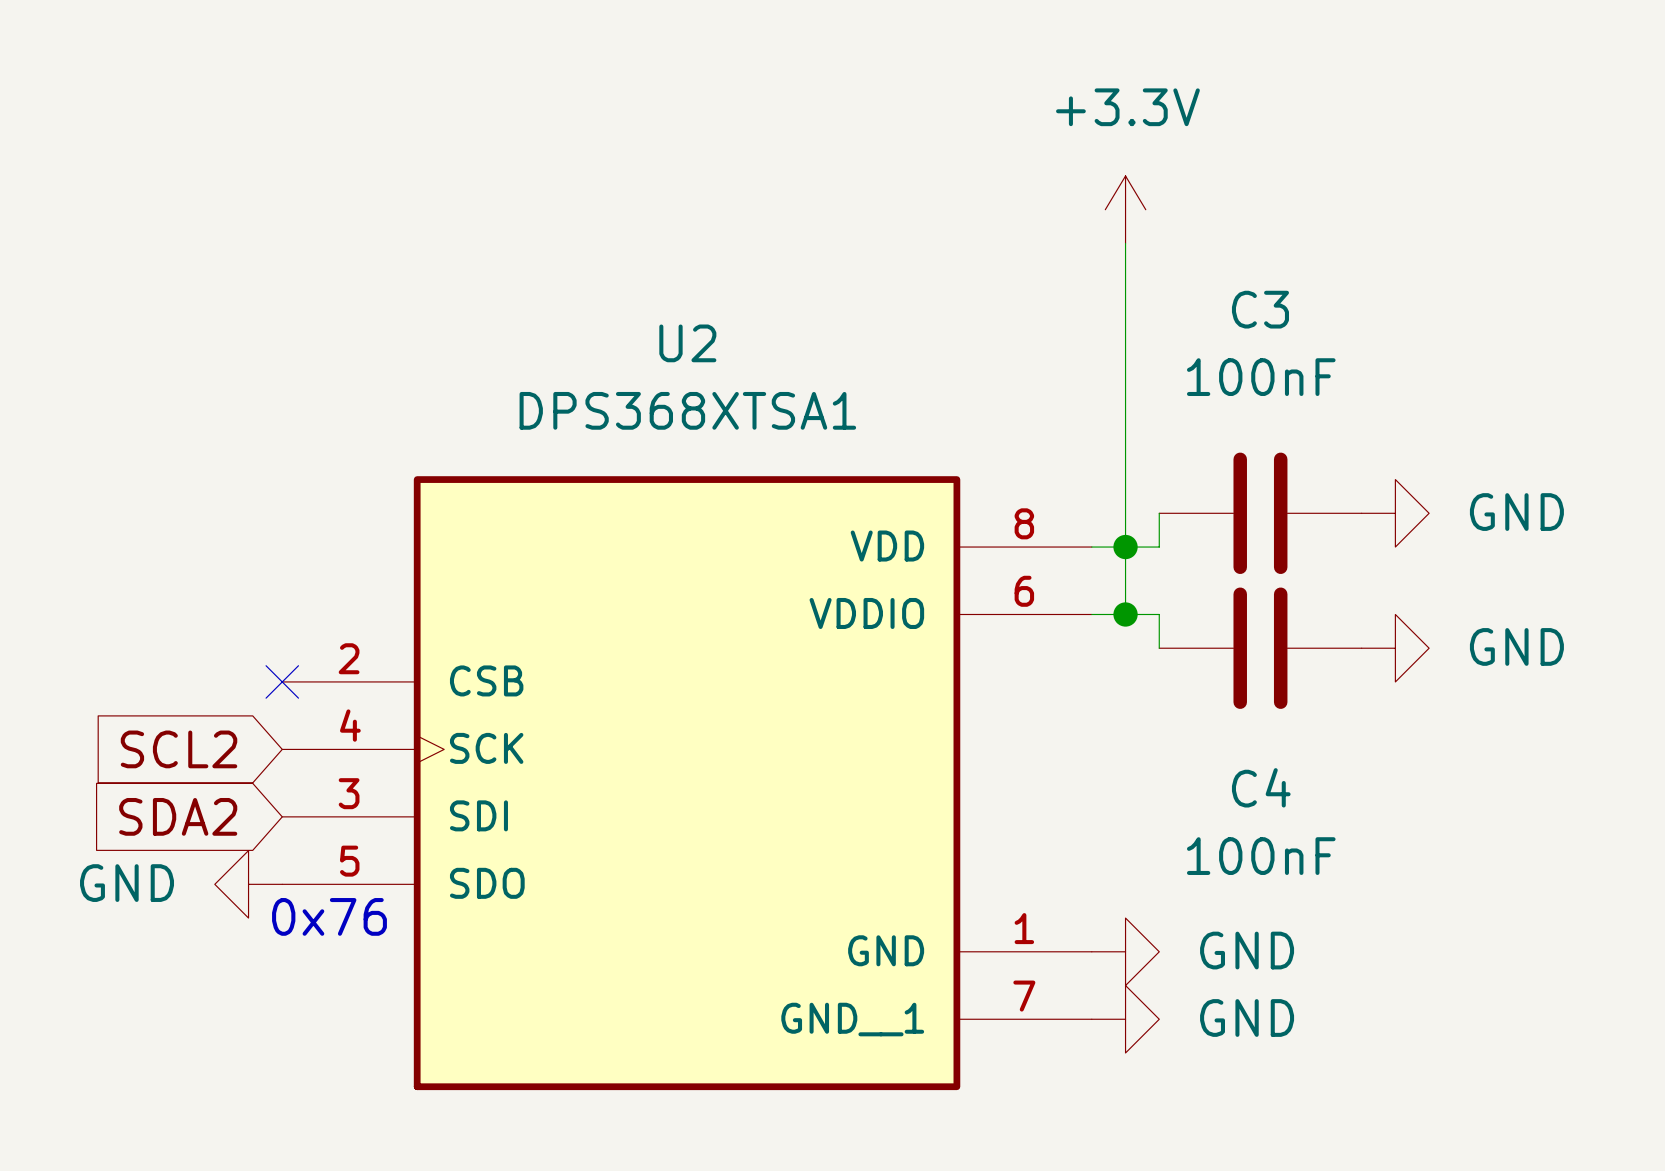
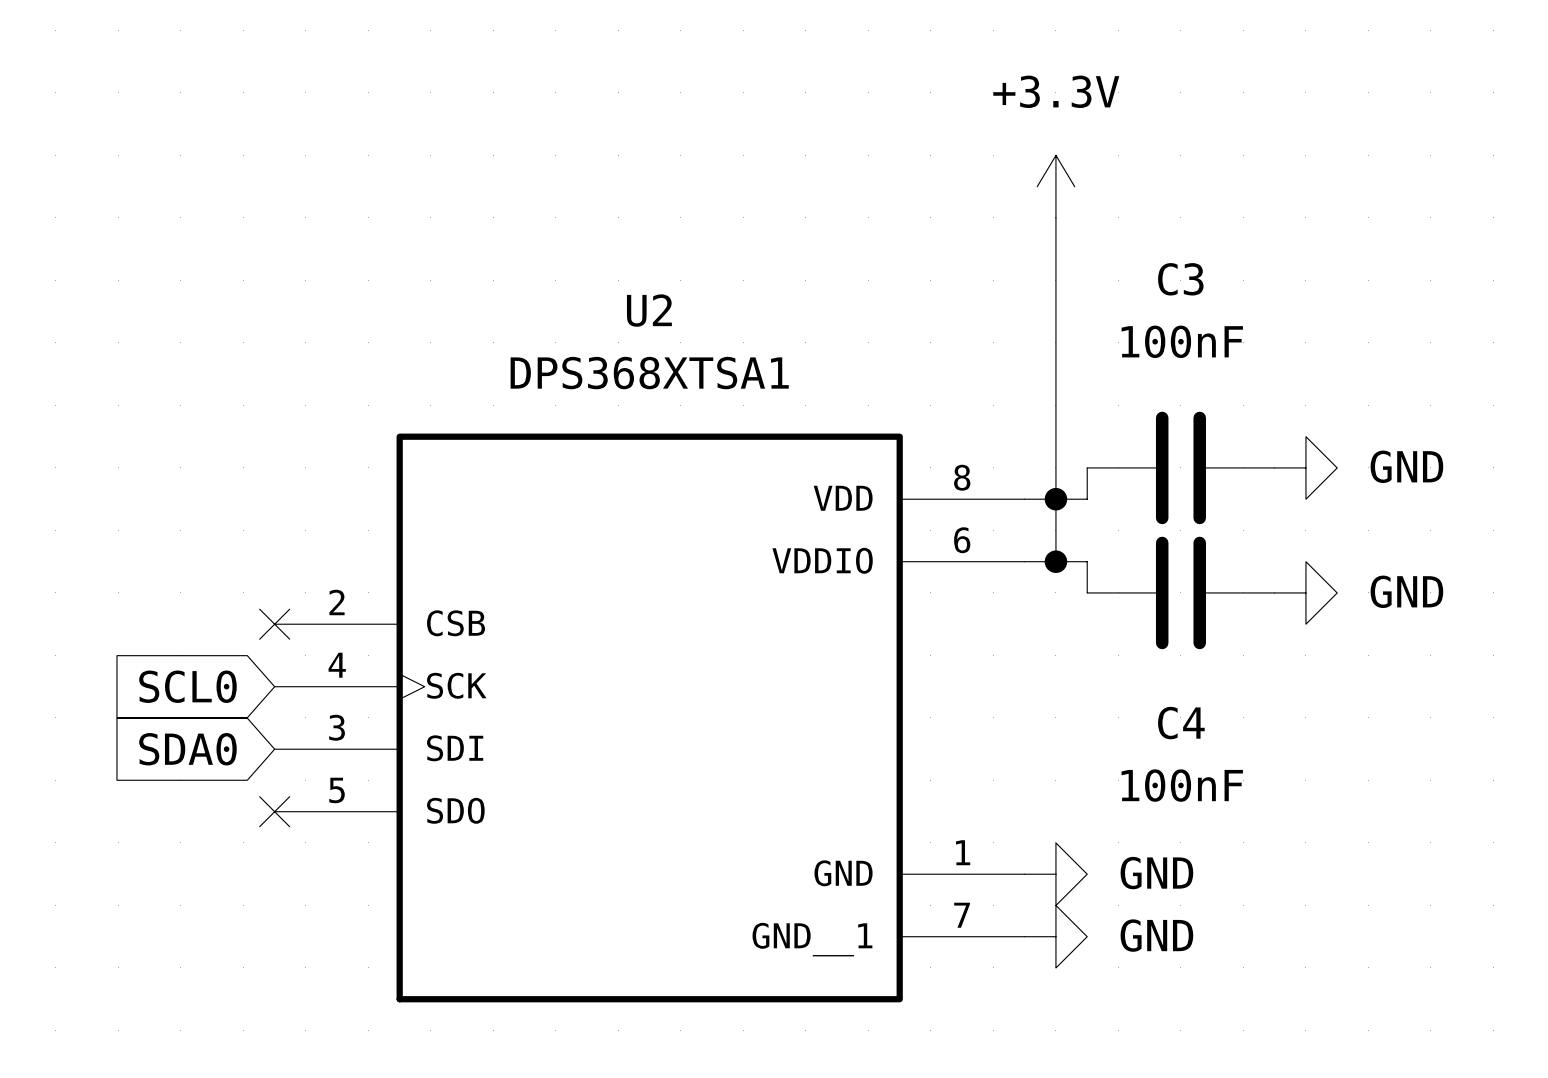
global label: SCL2 (179, 749) -> SCL0 (187, 686)
global label: SDA2 (178, 816) -> SDA0 (187, 749)
power symbol: GND (248, 884) -> none
no-connect mark: none -> (274, 811)
text: 0x76 (329, 916) -> none

